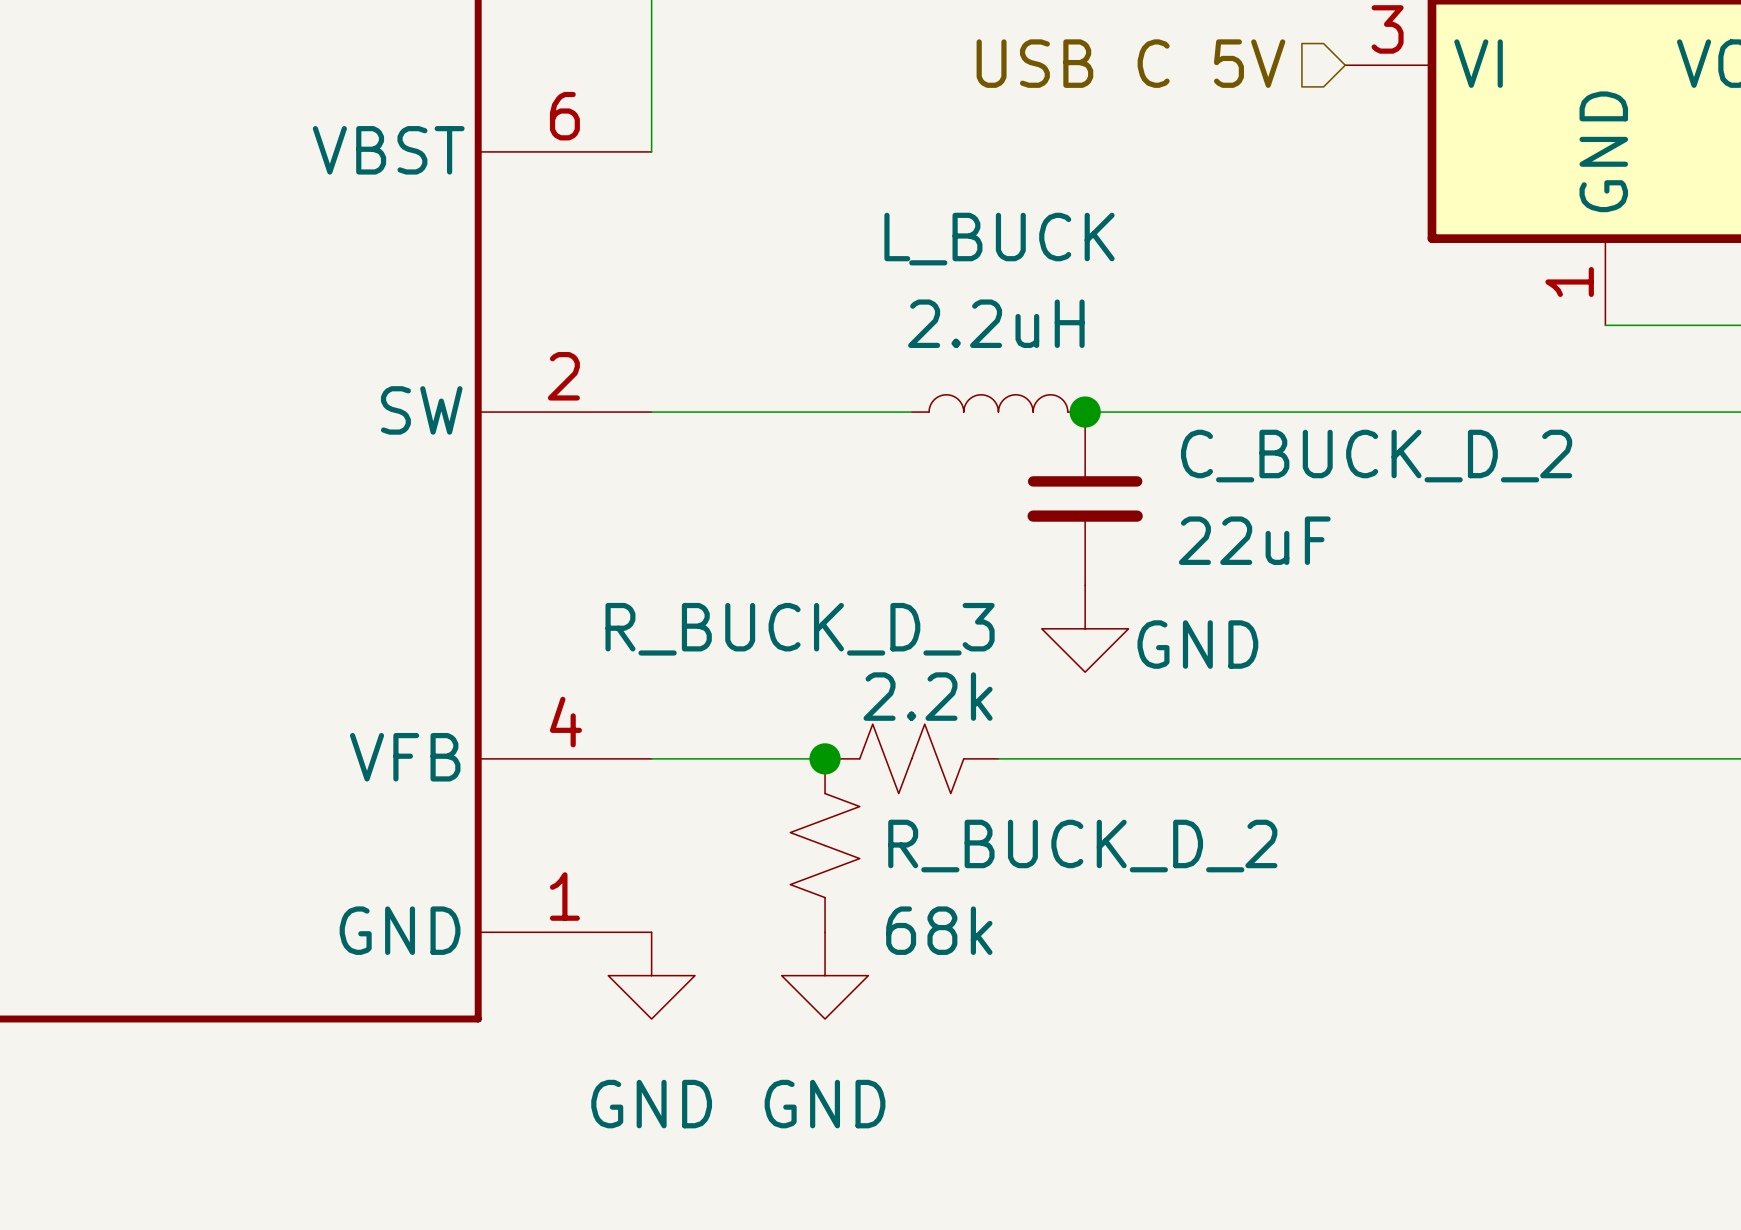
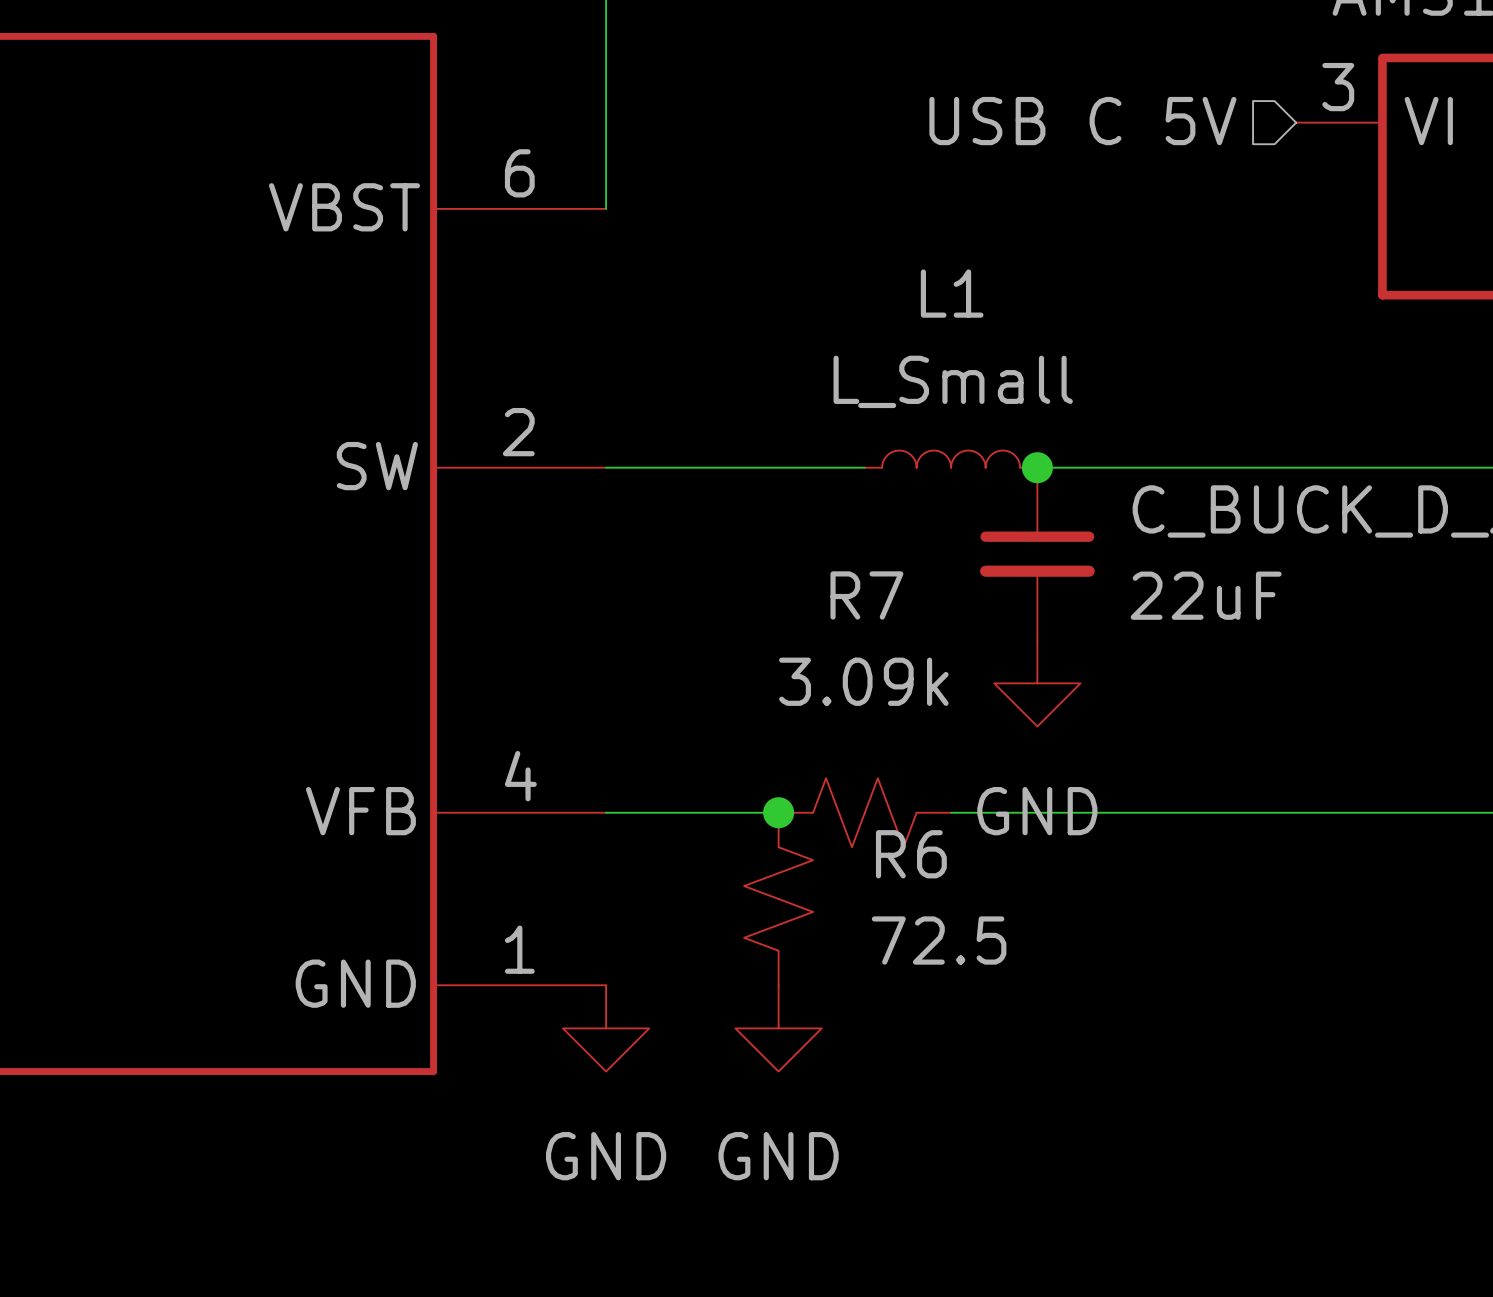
L_BUCK name: L_BUCK (999, 239) -> L1 (952, 293)
L_BUCK value: 2.2uH (996, 323) -> L_Small (953, 381)
R_BUCK_D_3 name: R_BUCK_D_3 (800, 629) -> R7 (866, 595)
power symbol text position: GND (1197, 644) -> GND (1037, 811)
R_BUCK_D_3 value: 2.2k (928, 696) -> 3.09k (863, 681)
R_BUCK_D_2 name: R_BUCK_D_2 (1082, 846) -> R6 (911, 854)
R_BUCK_D_2 value: 68k (939, 930) -> 72.5 (939, 940)

